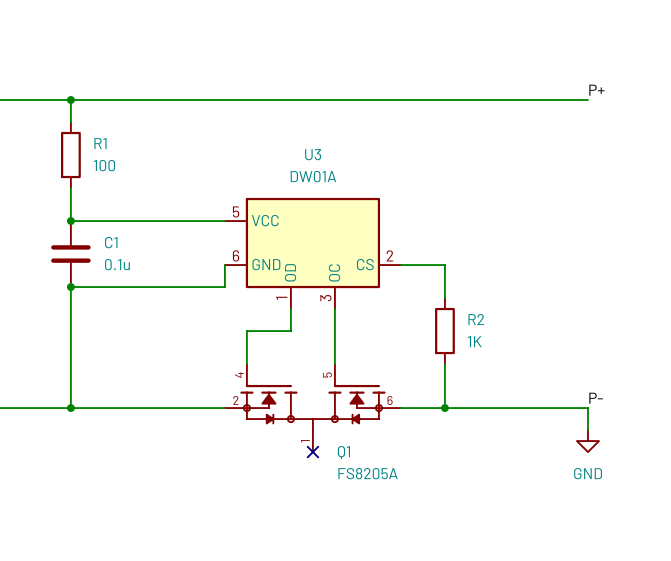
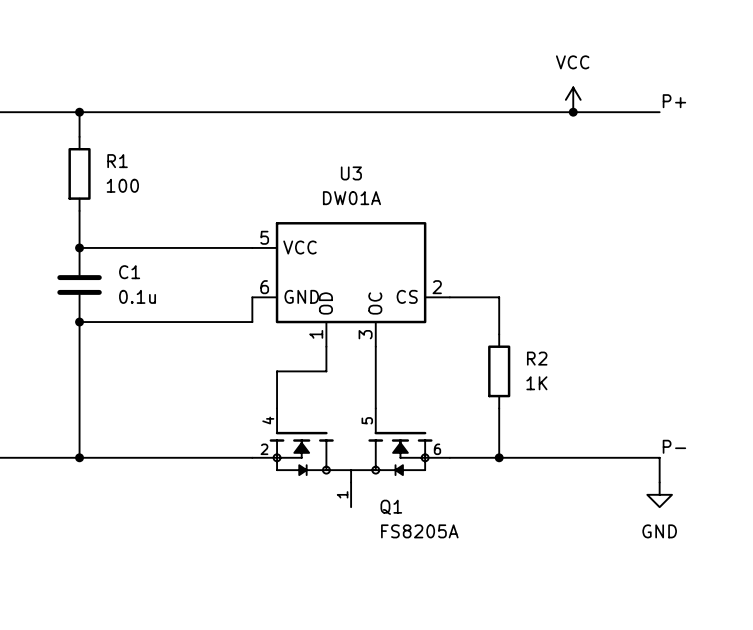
power symbol: none -> VCC (573, 99)
junction: none -> (573, 112)
no-connect mark: (312, 452) -> none

